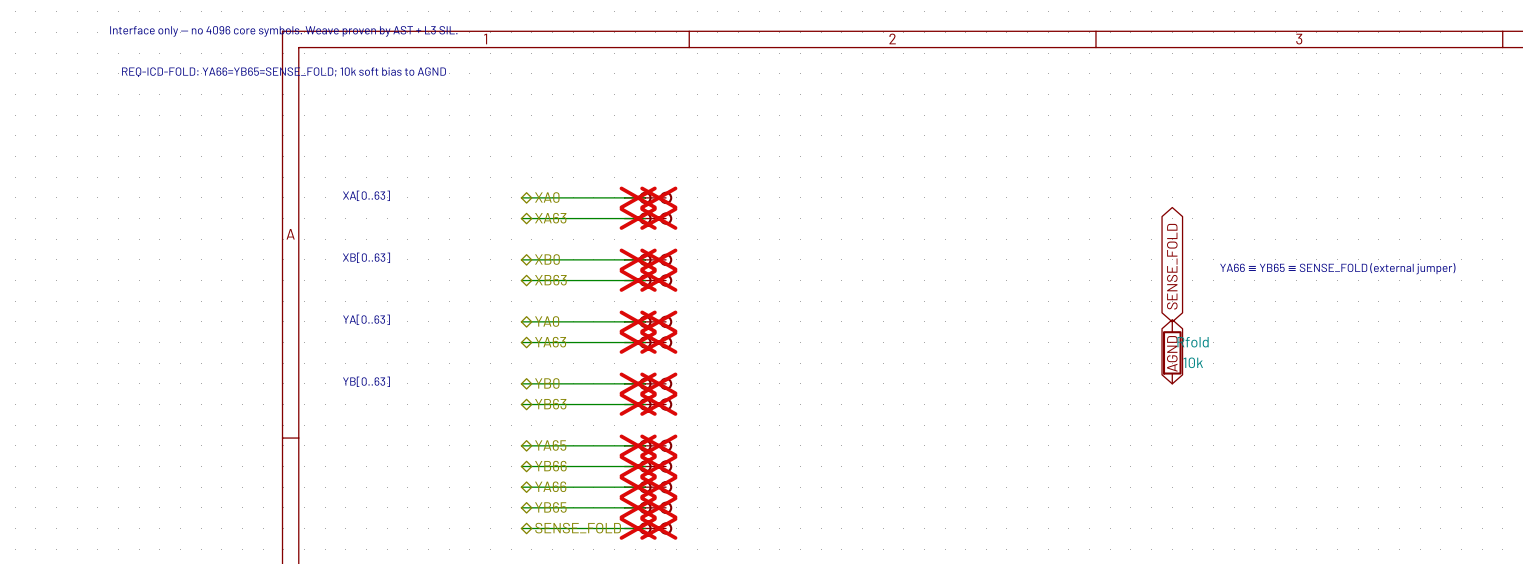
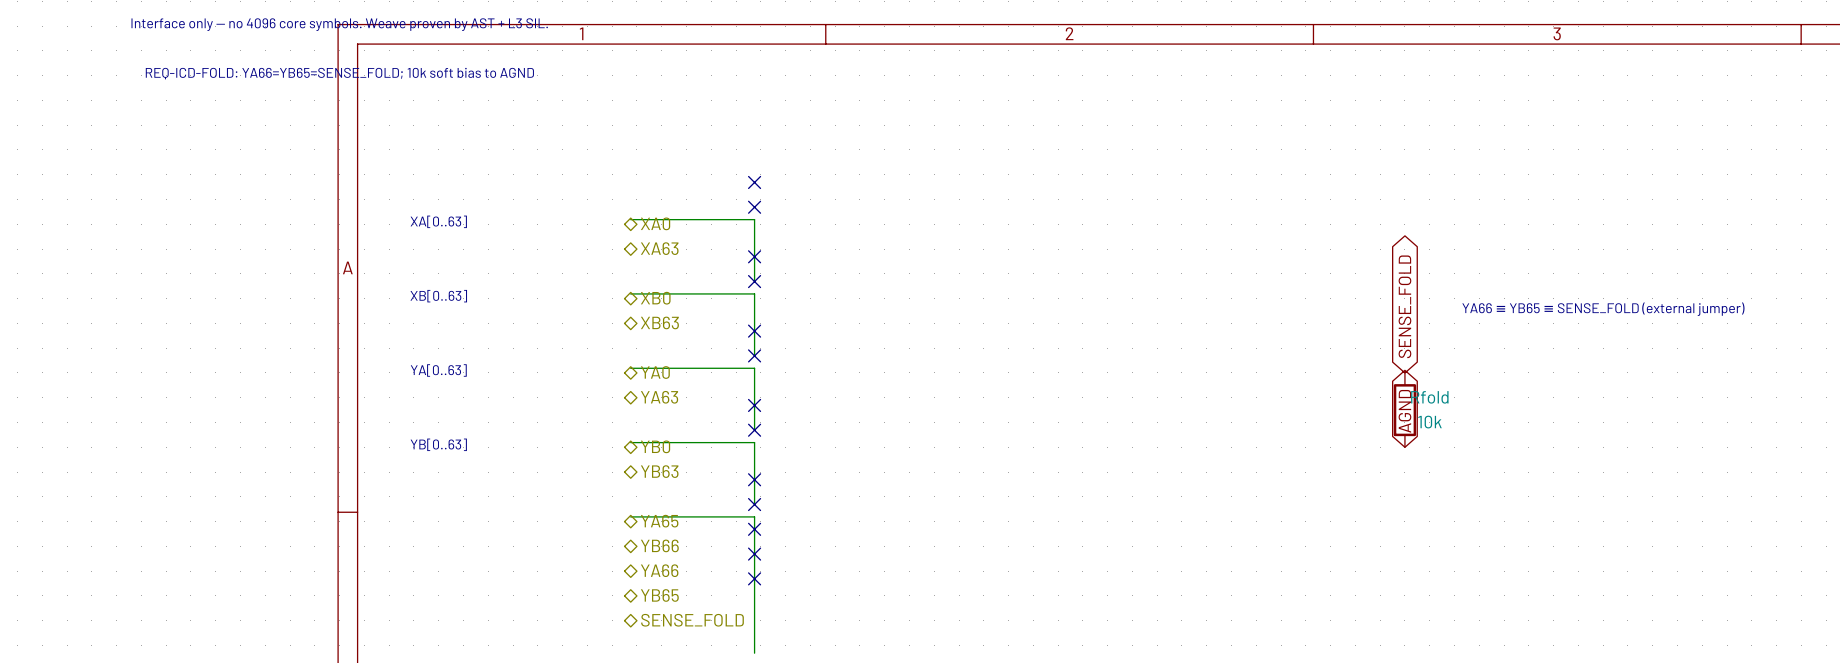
no-connect mark: none -> (754, 182)
no-connect mark: none -> (754, 207)
wire: none -> (630, 219) (754, 219) (754, 281)
wire: (521, 197) (645, 197) -> none
part: (638, 197) -> none
part: (658, 197) -> none
wire: (521, 218) (645, 218) -> none
part: (638, 218) -> none
part: (658, 218) -> none
no-connect mark: none -> (754, 256)
no-connect mark: none -> (754, 281)
wire: none -> (630, 293) (754, 293) (754, 355)
wire: (521, 259) (645, 259) -> none
part: (638, 259) -> none
part: (658, 259) -> none
wire: (521, 280) (645, 280) -> none
part: (638, 280) -> none
part: (658, 280) -> none
no-connect mark: none -> (754, 331)
no-connect mark: none -> (754, 355)
wire: none -> (630, 368) (754, 368) (754, 430)
wire: (521, 321) (645, 321) -> none
part: (638, 321) -> none
part: (658, 321) -> none
wire: (521, 342) (645, 342) -> none
part: (638, 342) -> none
part: (658, 342) -> none
no-connect mark: none -> (754, 405)
no-connect mark: none -> (754, 430)
wire: none -> (630, 442) (754, 442) (754, 504)
wire: (521, 383) (645, 383) -> none
part: (638, 383) -> none
part: (658, 383) -> none
wire: (521, 404) (645, 404) -> none
part: (638, 404) -> none
part: (658, 404) -> none
no-connect mark: none -> (754, 479)
no-connect mark: none -> (754, 504)
wire: none -> (630, 516) (754, 516) (754, 653)
wire: (521, 445) (645, 445) -> none
part: (638, 445) -> none
part: (658, 445) -> none
no-connect mark: none -> (754, 529)
wire: (521, 466) (645, 466) -> none
part: (638, 466) -> none
part: (658, 466) -> none
no-connect mark: none -> (754, 554)
wire: (521, 487) (645, 487) -> none
part: (638, 487) -> none
part: (658, 487) -> none
no-connect mark: none -> (754, 578)
wire: (521, 507) (645, 507) -> none
part: (638, 507) -> none
part: (658, 507) -> none
wire: (521, 528) (645, 528) -> none
part: (638, 528) -> none
part: (658, 528) -> none

